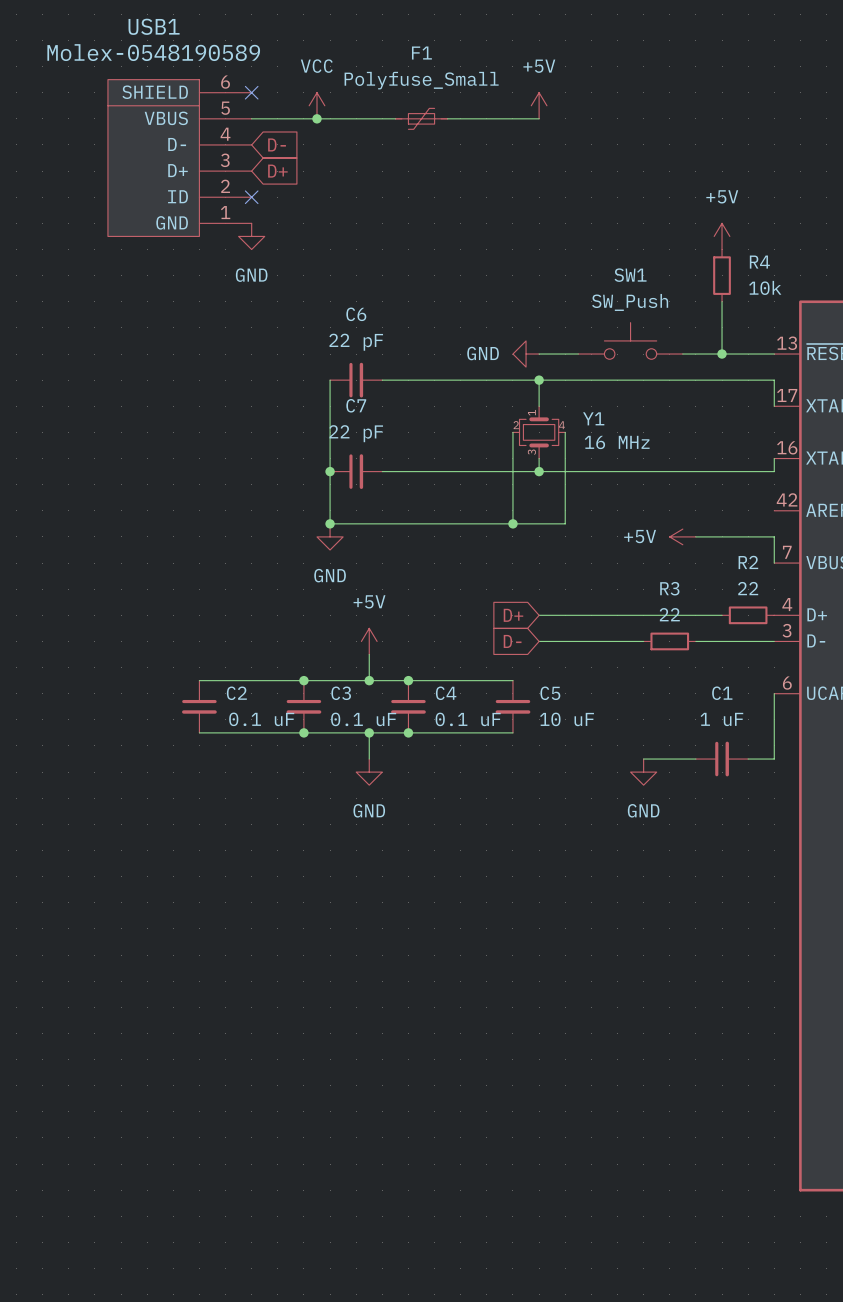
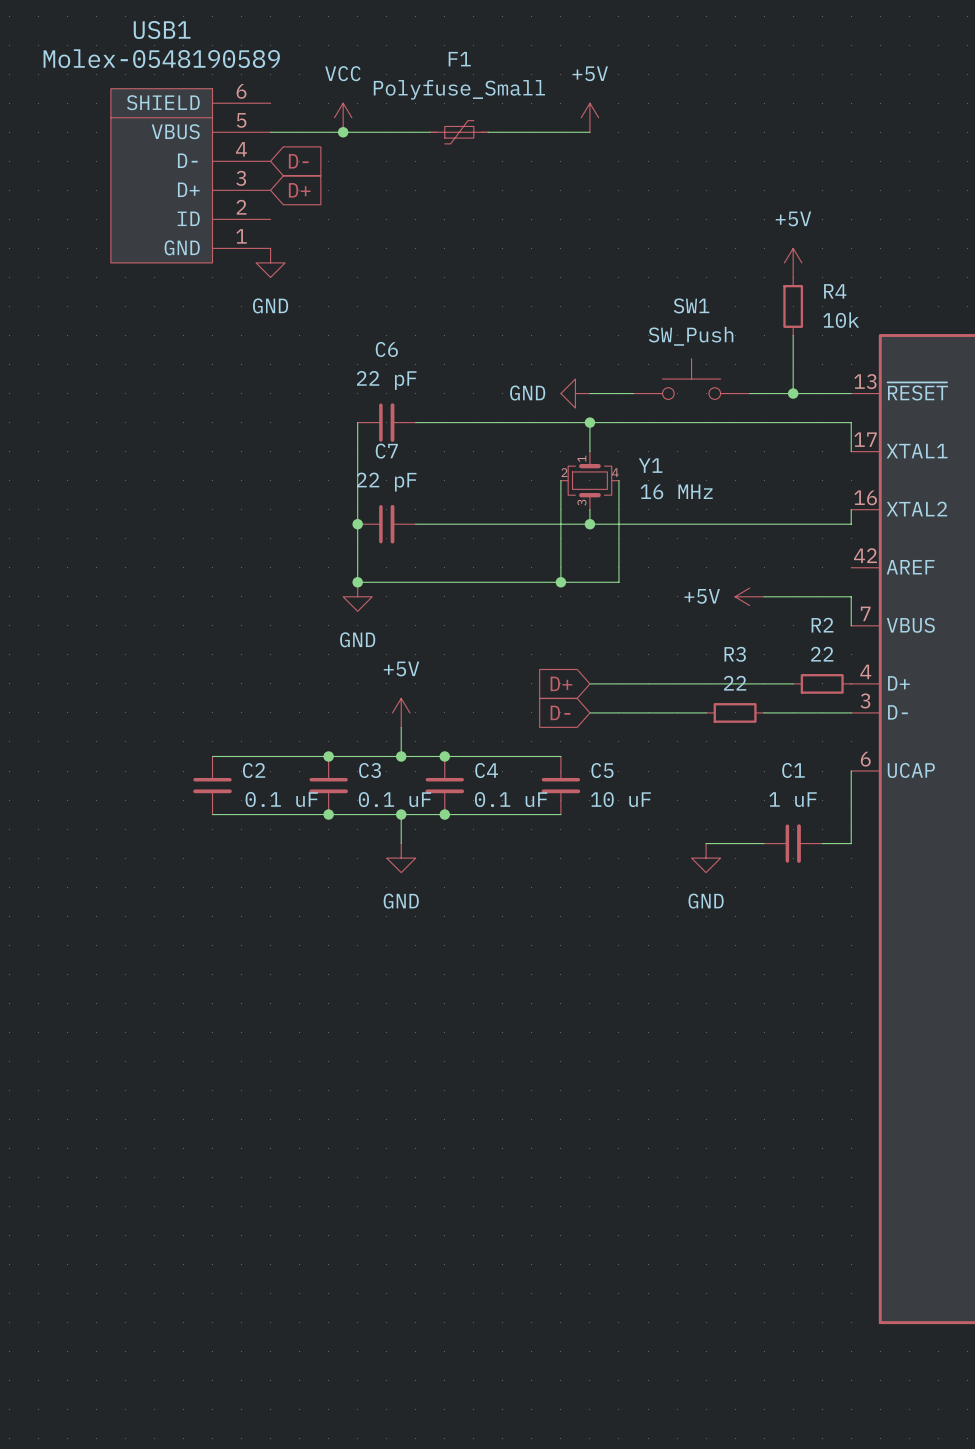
no-connect mark: (251, 92) -> none
no-connect mark: (251, 197) -> none

